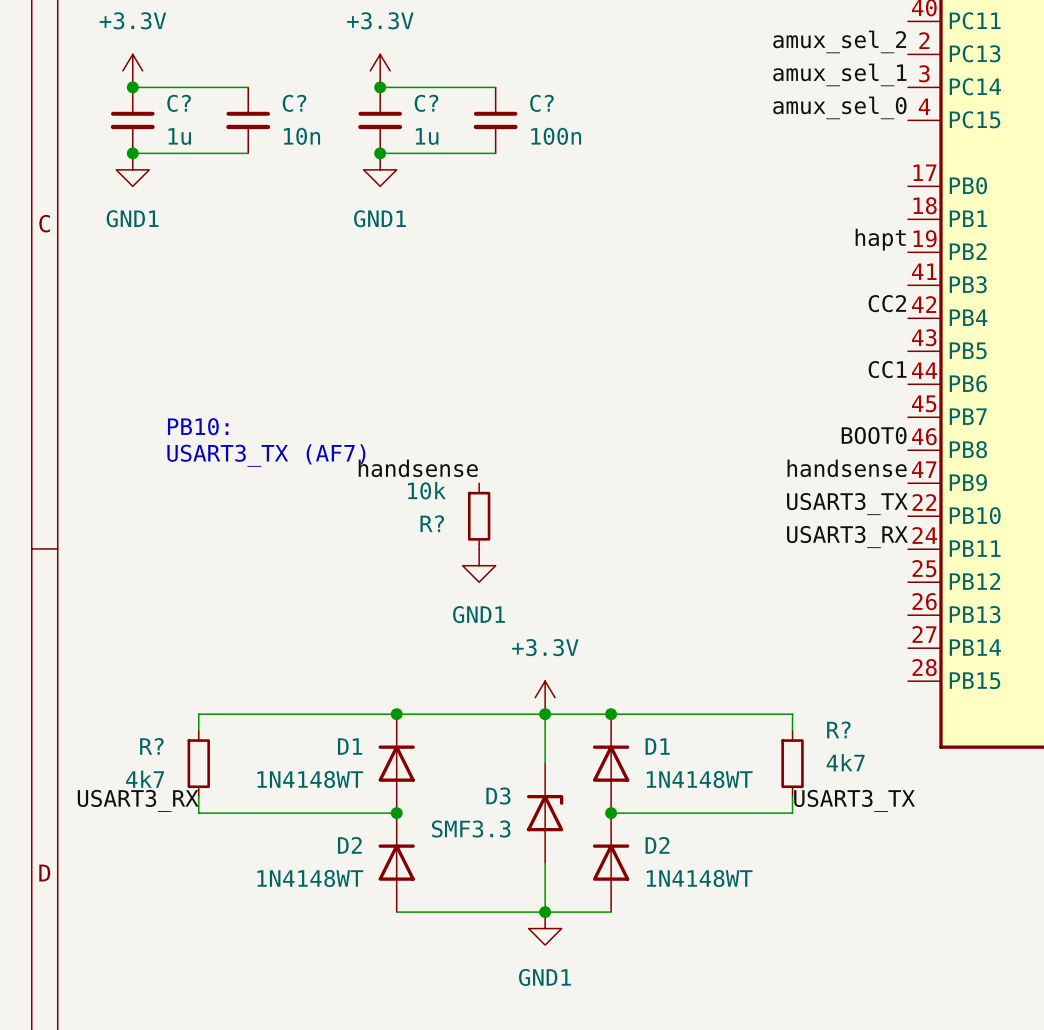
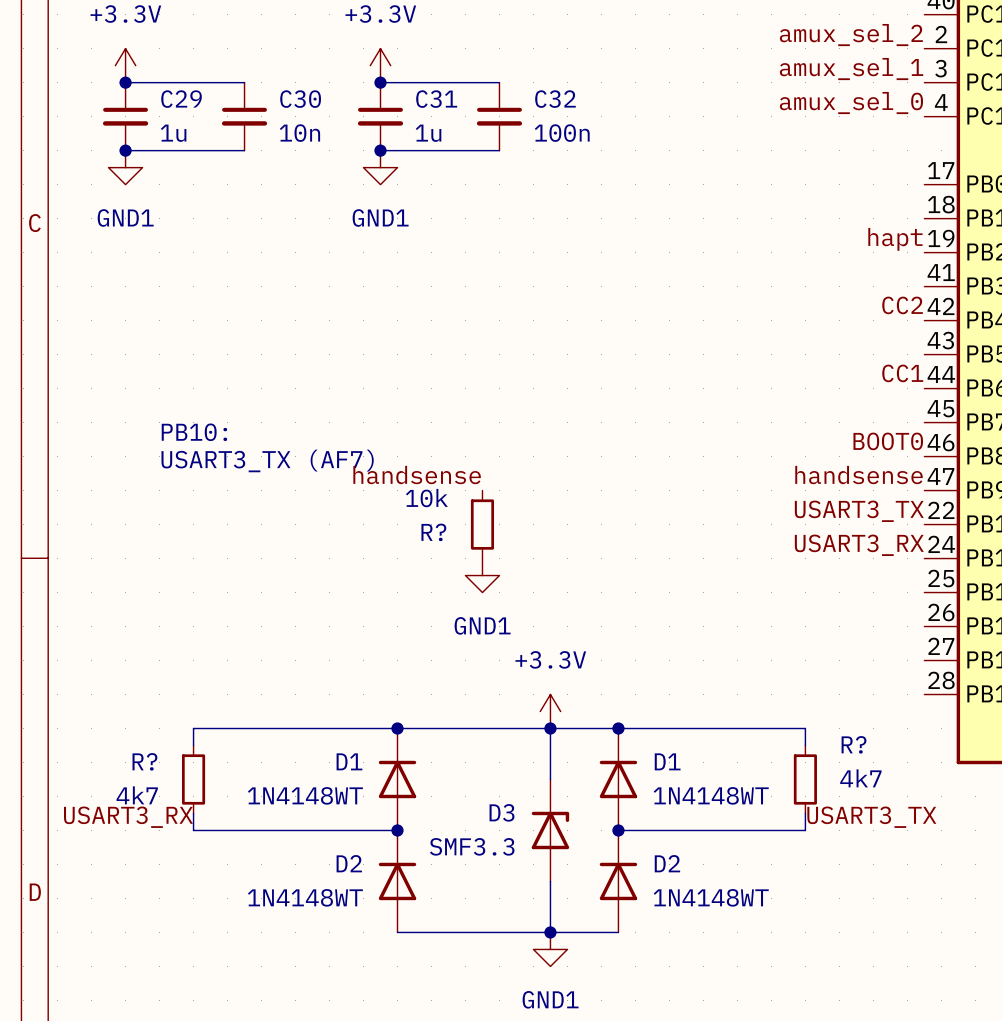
C? name: C? (179, 103) -> C29 (181, 99)
C? name: C? (294, 103) -> C30 (300, 99)
C? name: C? (426, 103) -> C31 (436, 99)
C? name: C? (541, 103) -> C32 (555, 99)

